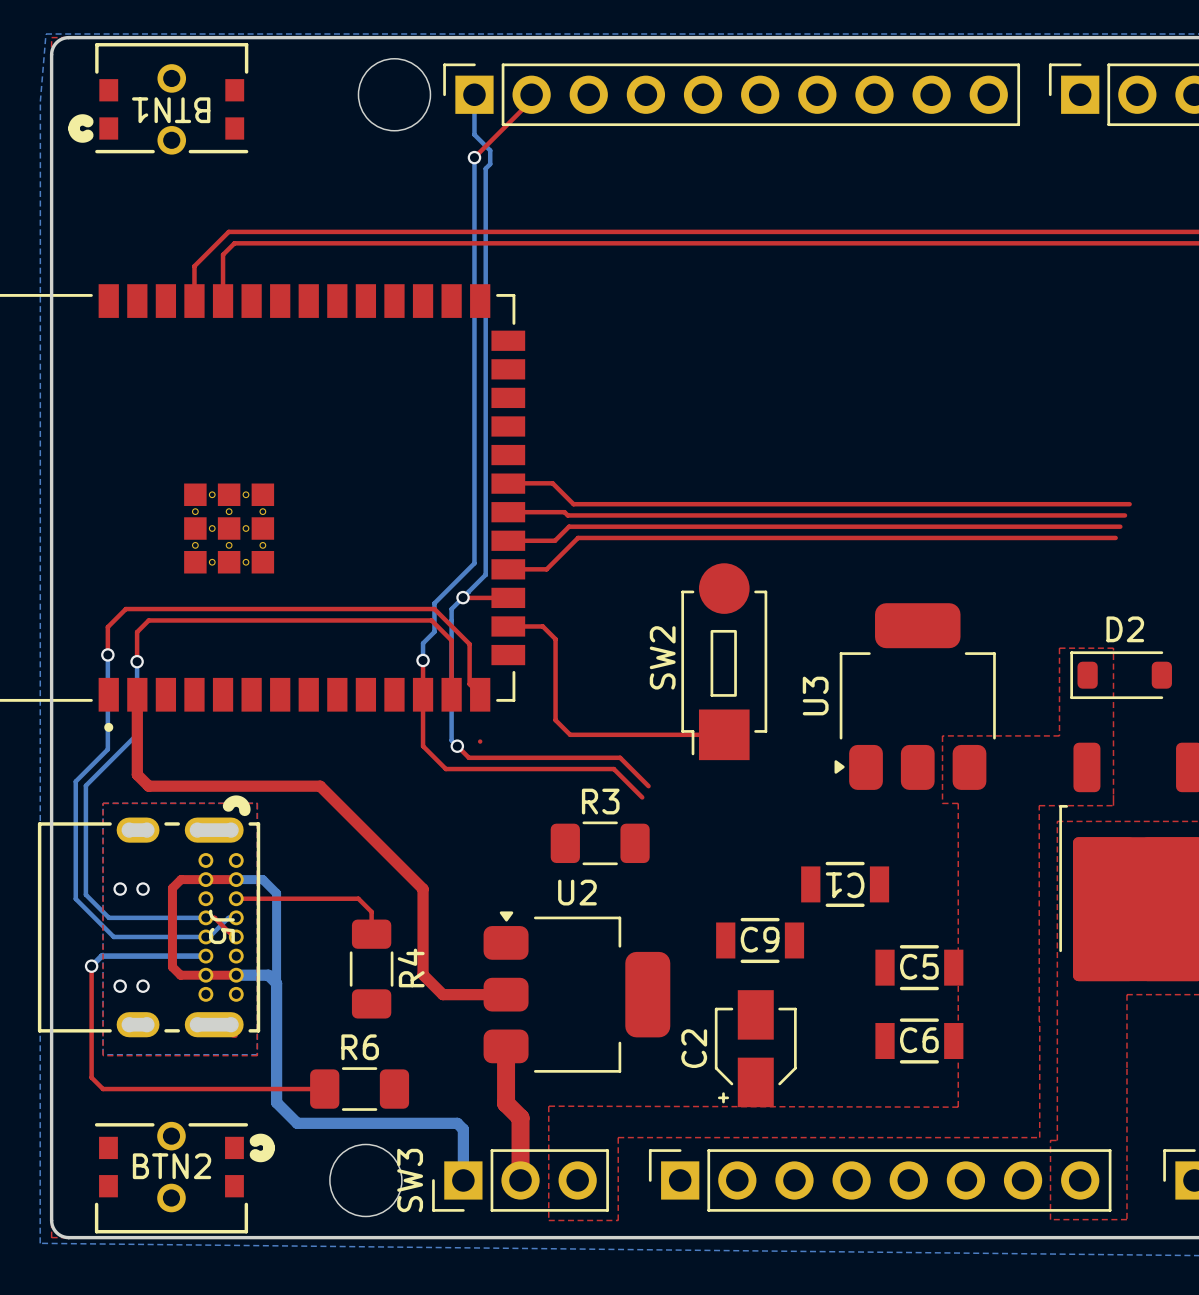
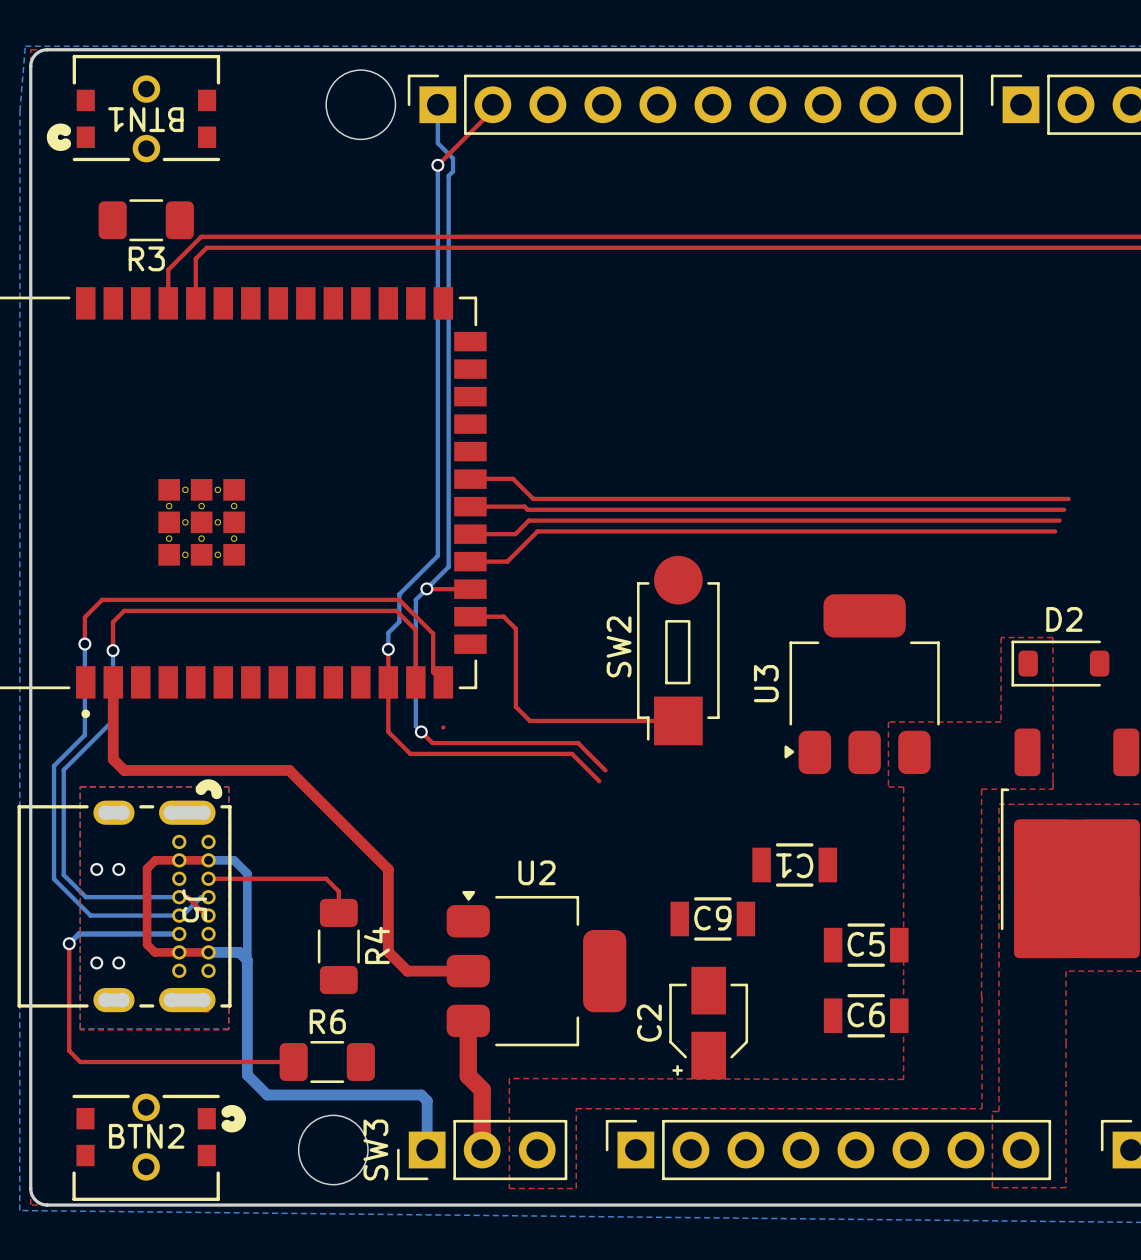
R3 name position: R3 (600, 801) -> R3 (146, 258)
R3 position: (600, 843) -> (146, 220)

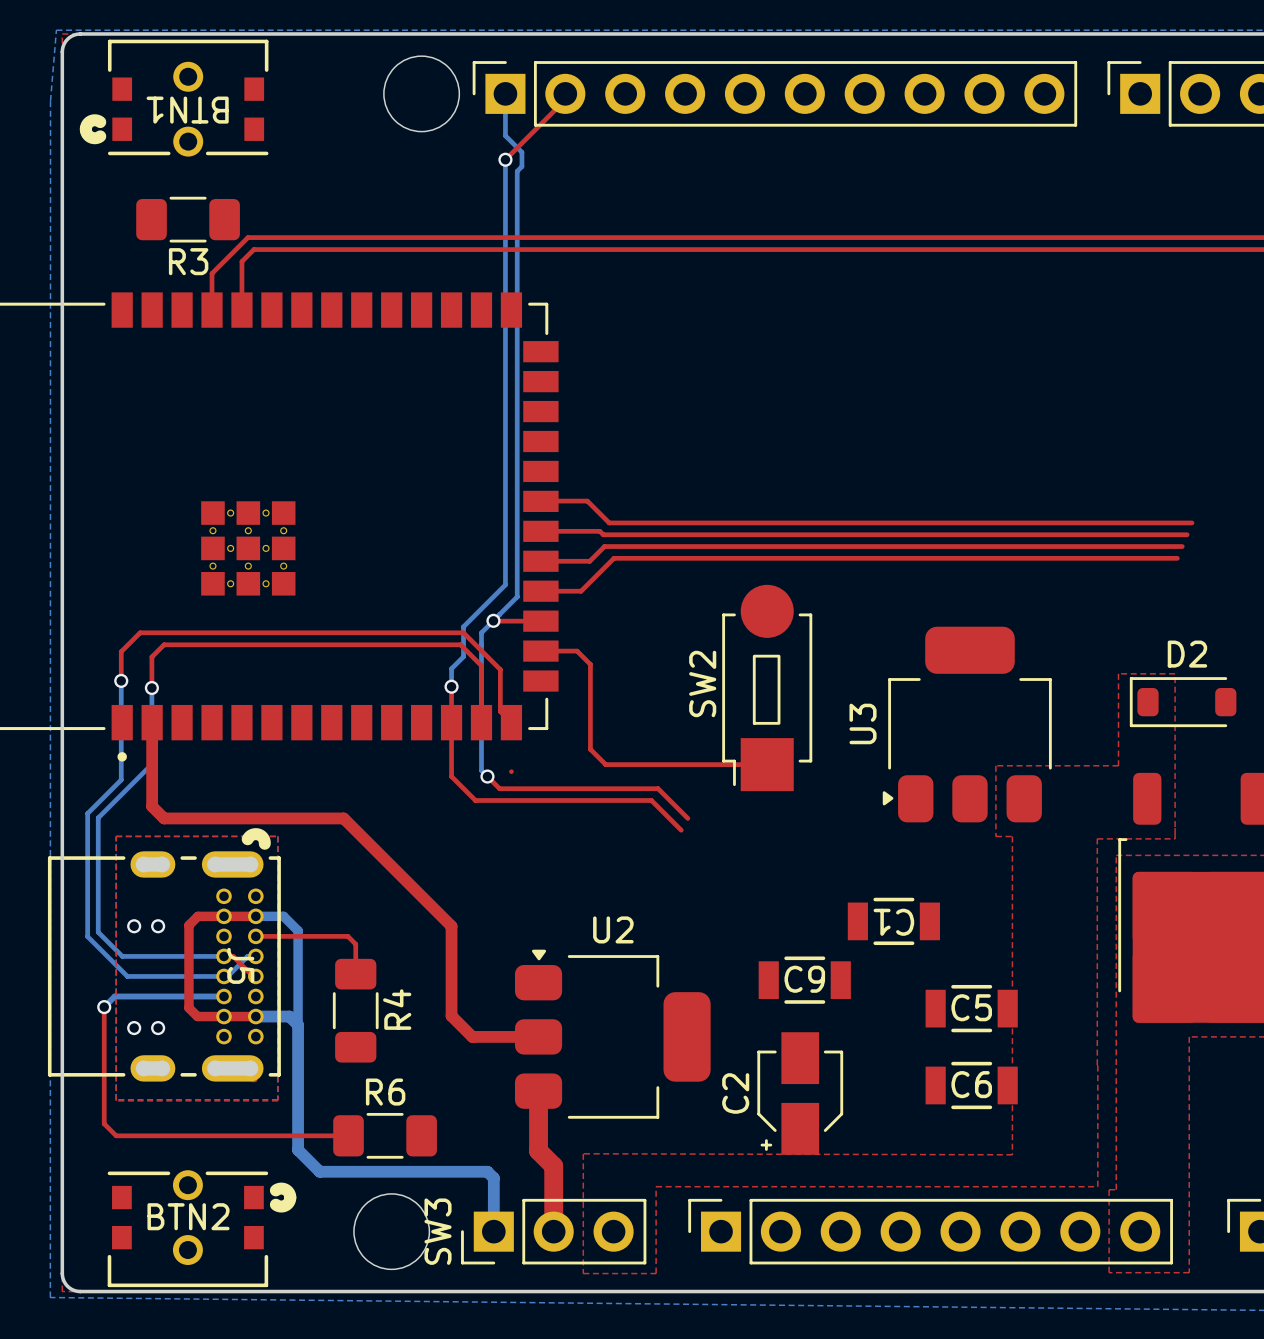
top track: (293, 878) (326, 878) (338, 891) (338, 913) -> (347, 936) (355, 944) (355, 974)
R4 position: (338, 946) -> (355, 1010)

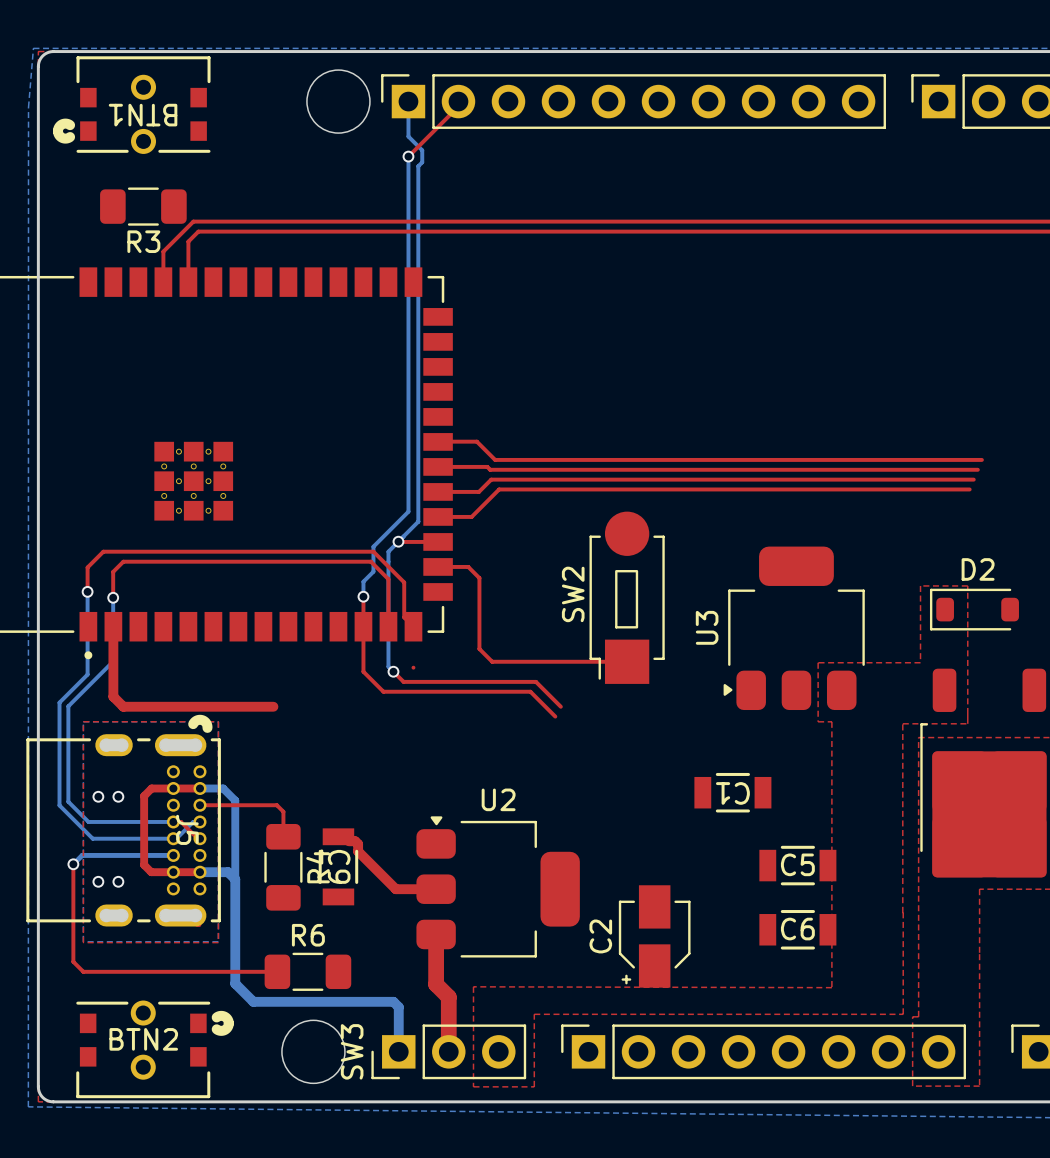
top track: (343, 818) (451, 926) (451, 1016) (472, 1036) (490, 1036) -> (348, 841) (355, 841) (358, 844) (358, 851) (395, 889)
C9 rotation: 0° (804, 980) -> 90° clockwise (338, 866)
C9 position: (804, 980) -> (338, 866)

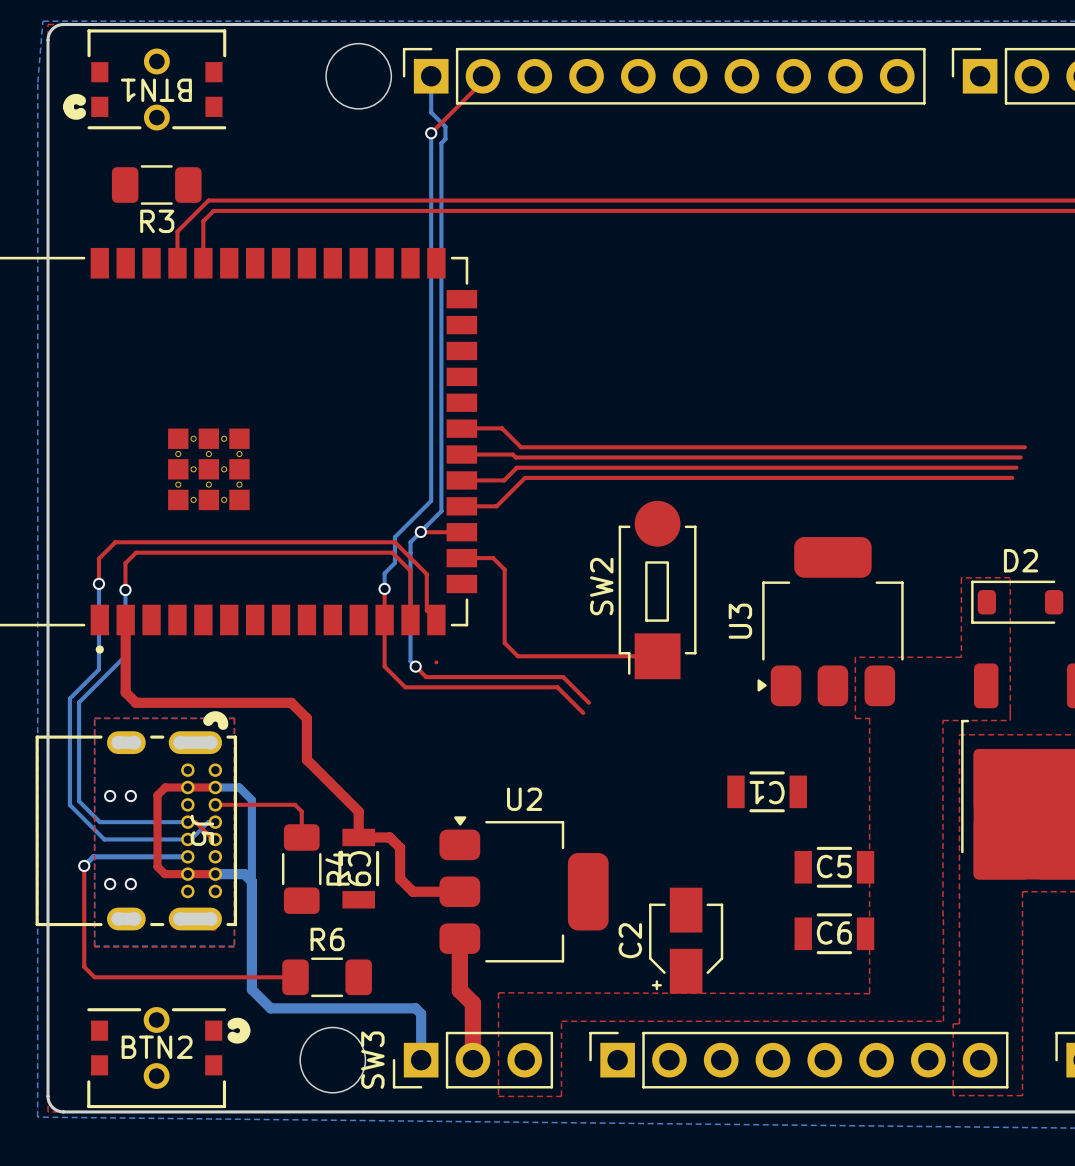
top track: (348, 841) (355, 841) (358, 844) (358, 851) (395, 889) -> (291, 702) (306, 718) (306, 759) (358, 811) (358, 837) (389, 837) (400, 847) (400, 878) (412, 891) (418, 891)

